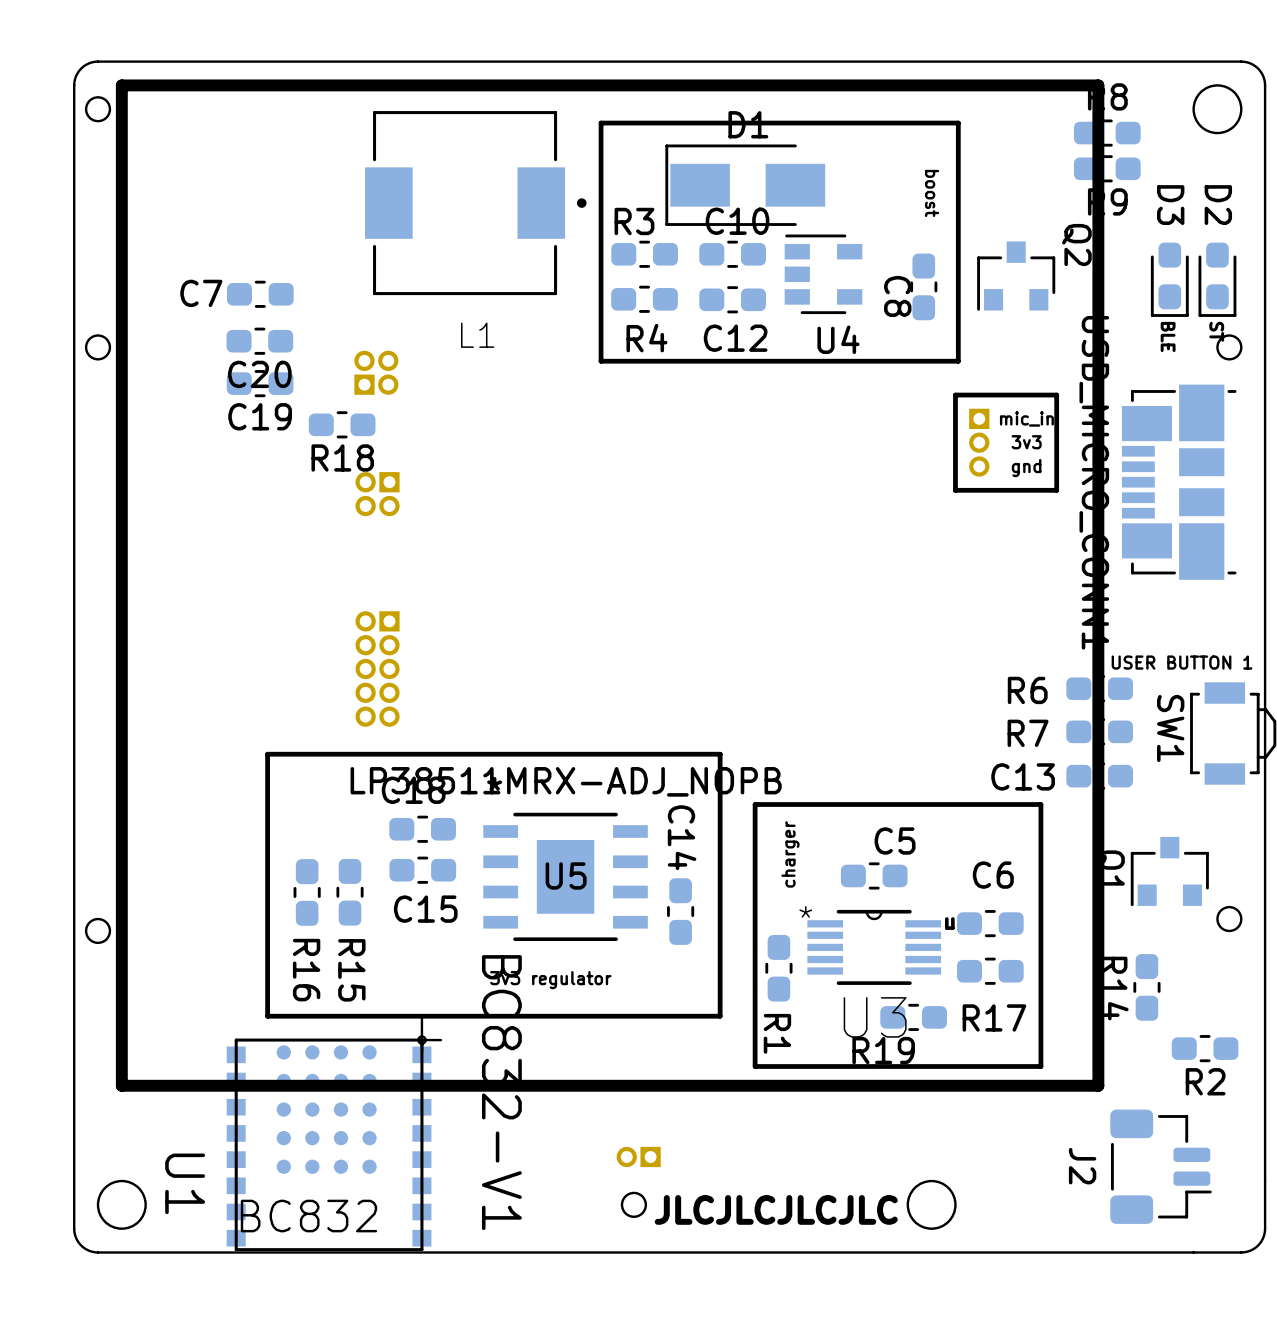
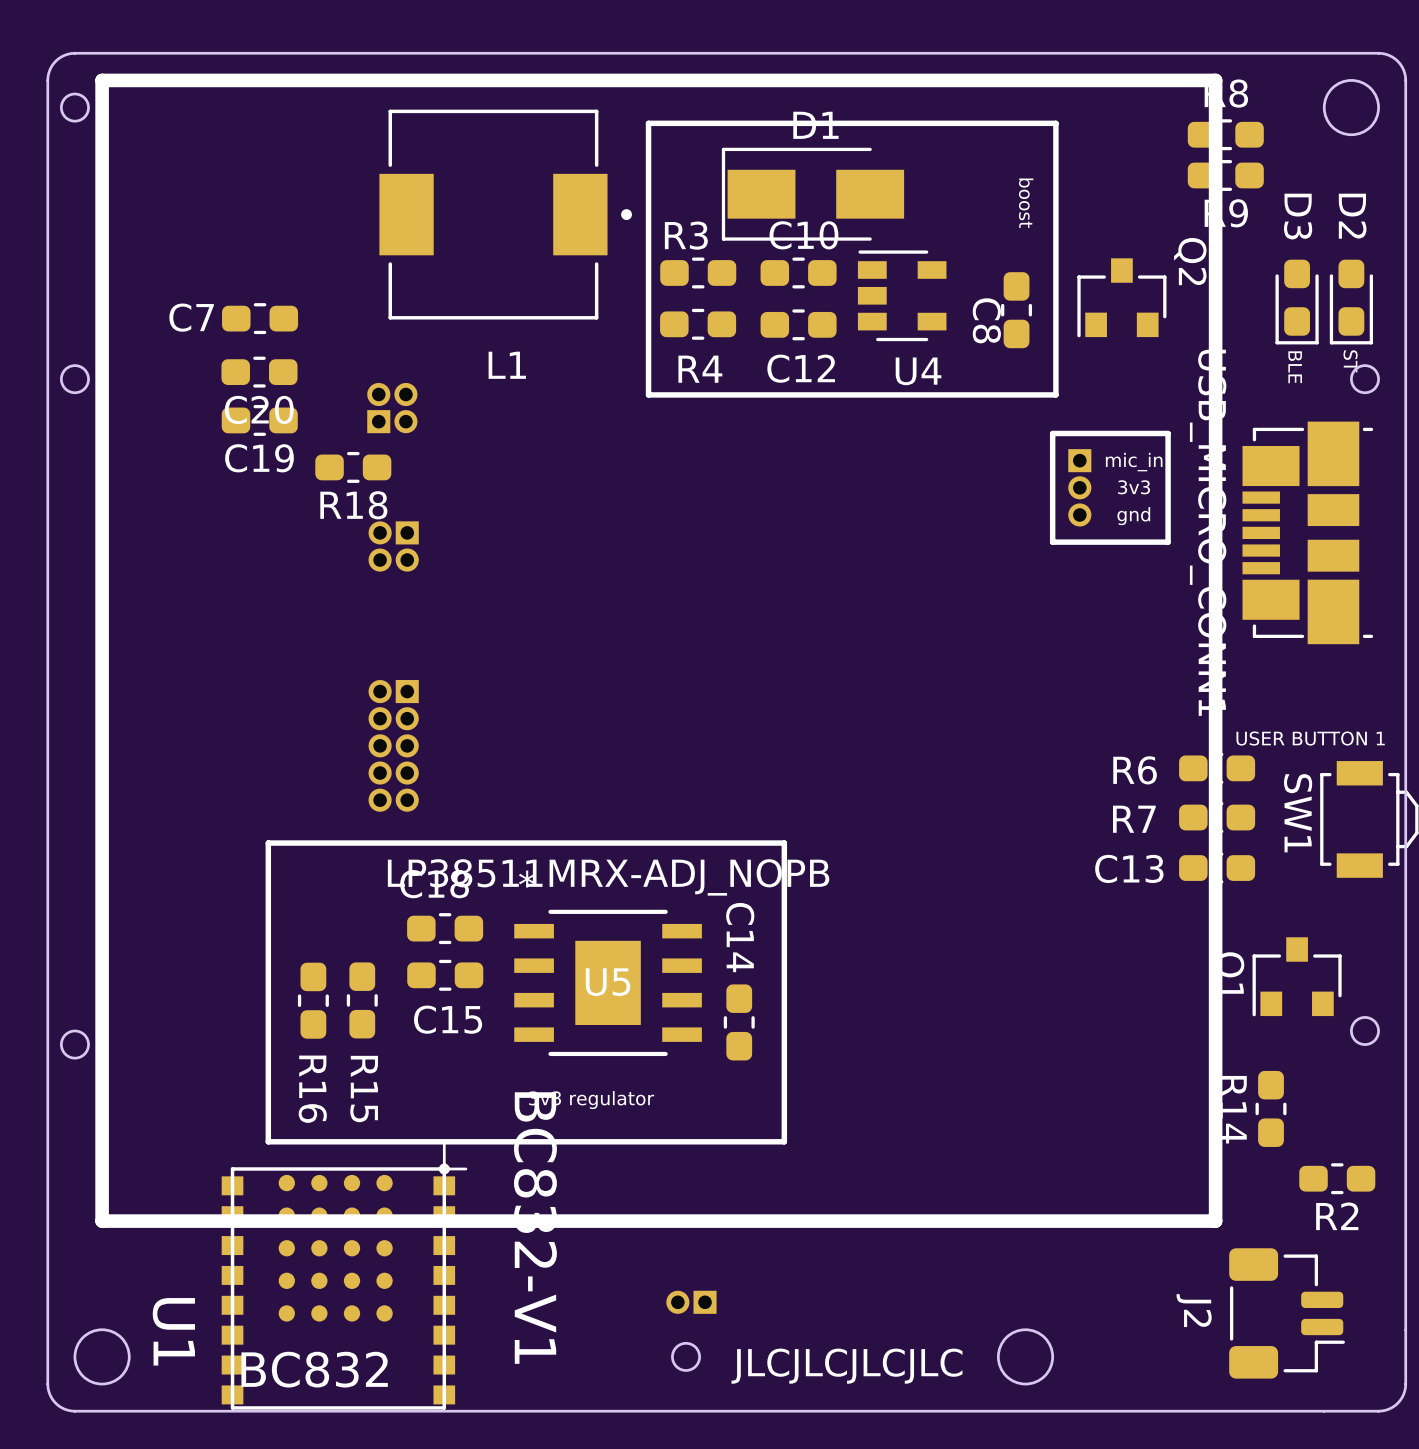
line: (1040, 804) (1040, 1066) (755, 1066) (755, 804) (1040, 804) -> none
text: charger (790, 854) -> none
C5: (874, 875) -> none
C6: (990, 923) -> none
U3: (881, 947) -> none
R1: (778, 968) -> none
R17: (990, 971) -> none
R19: (913, 1017) -> none

